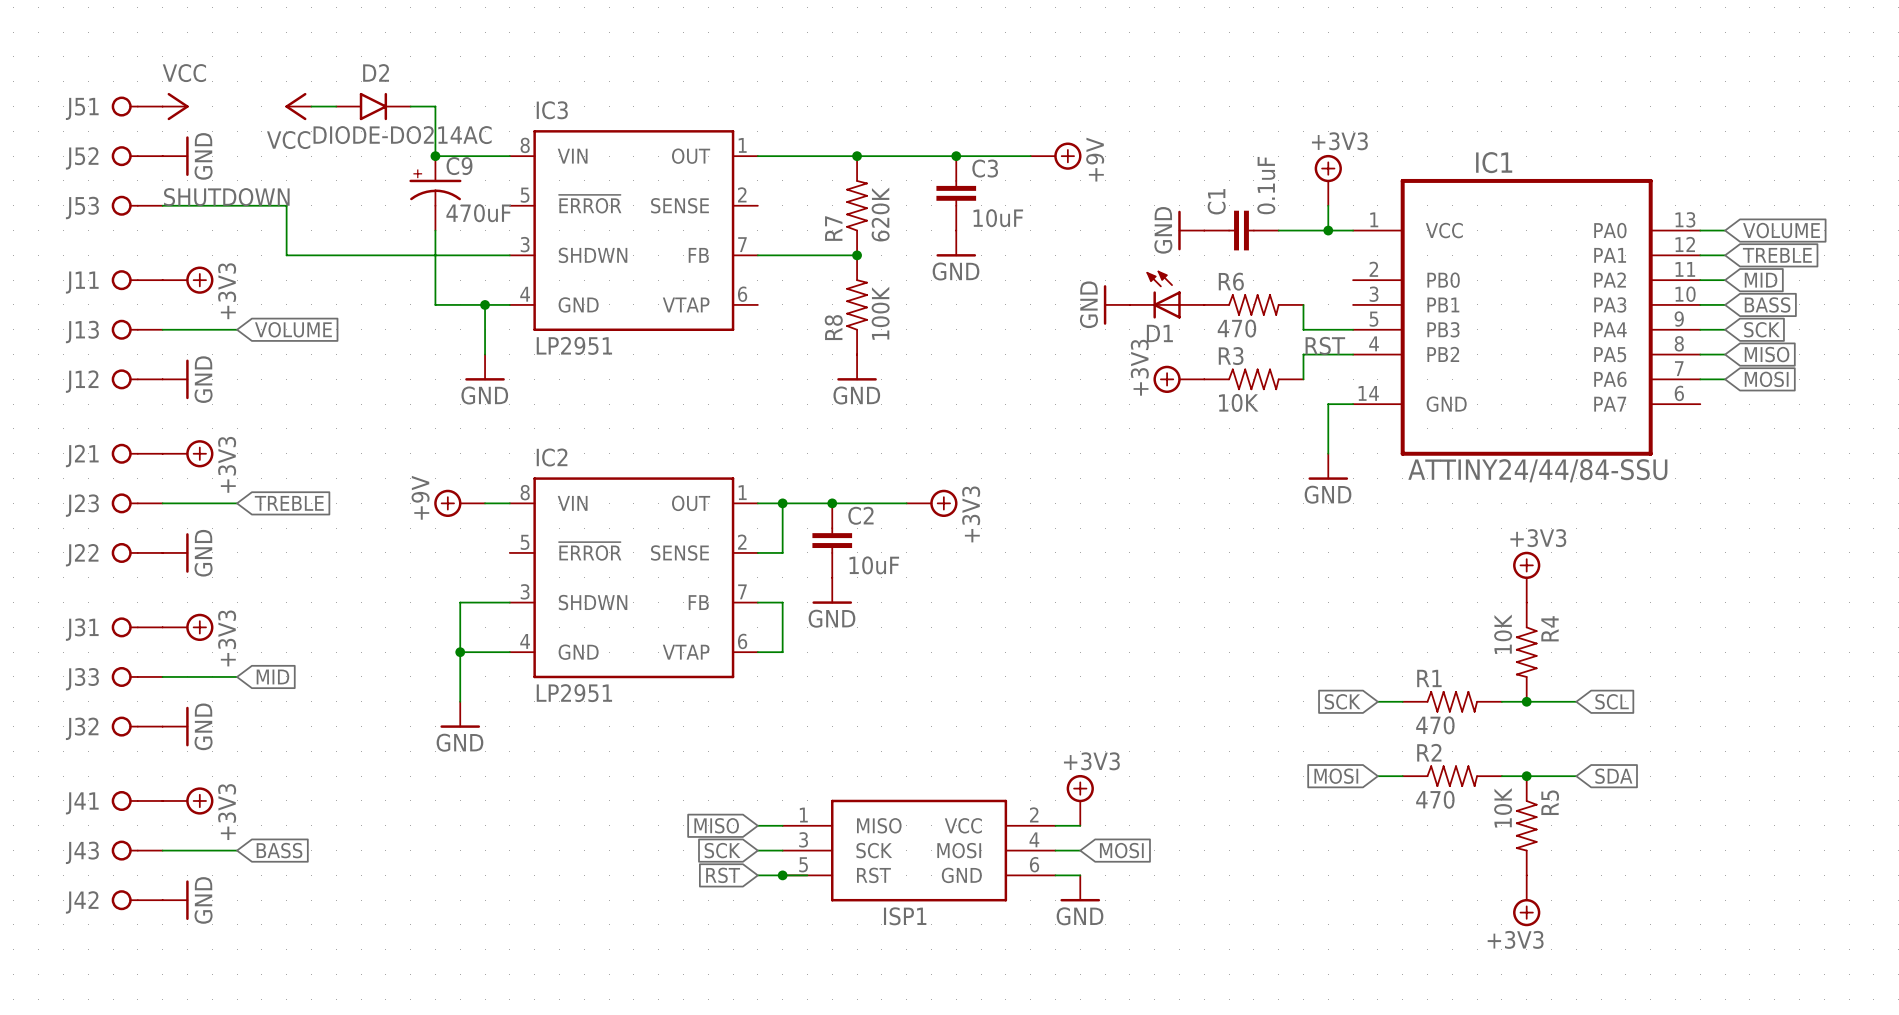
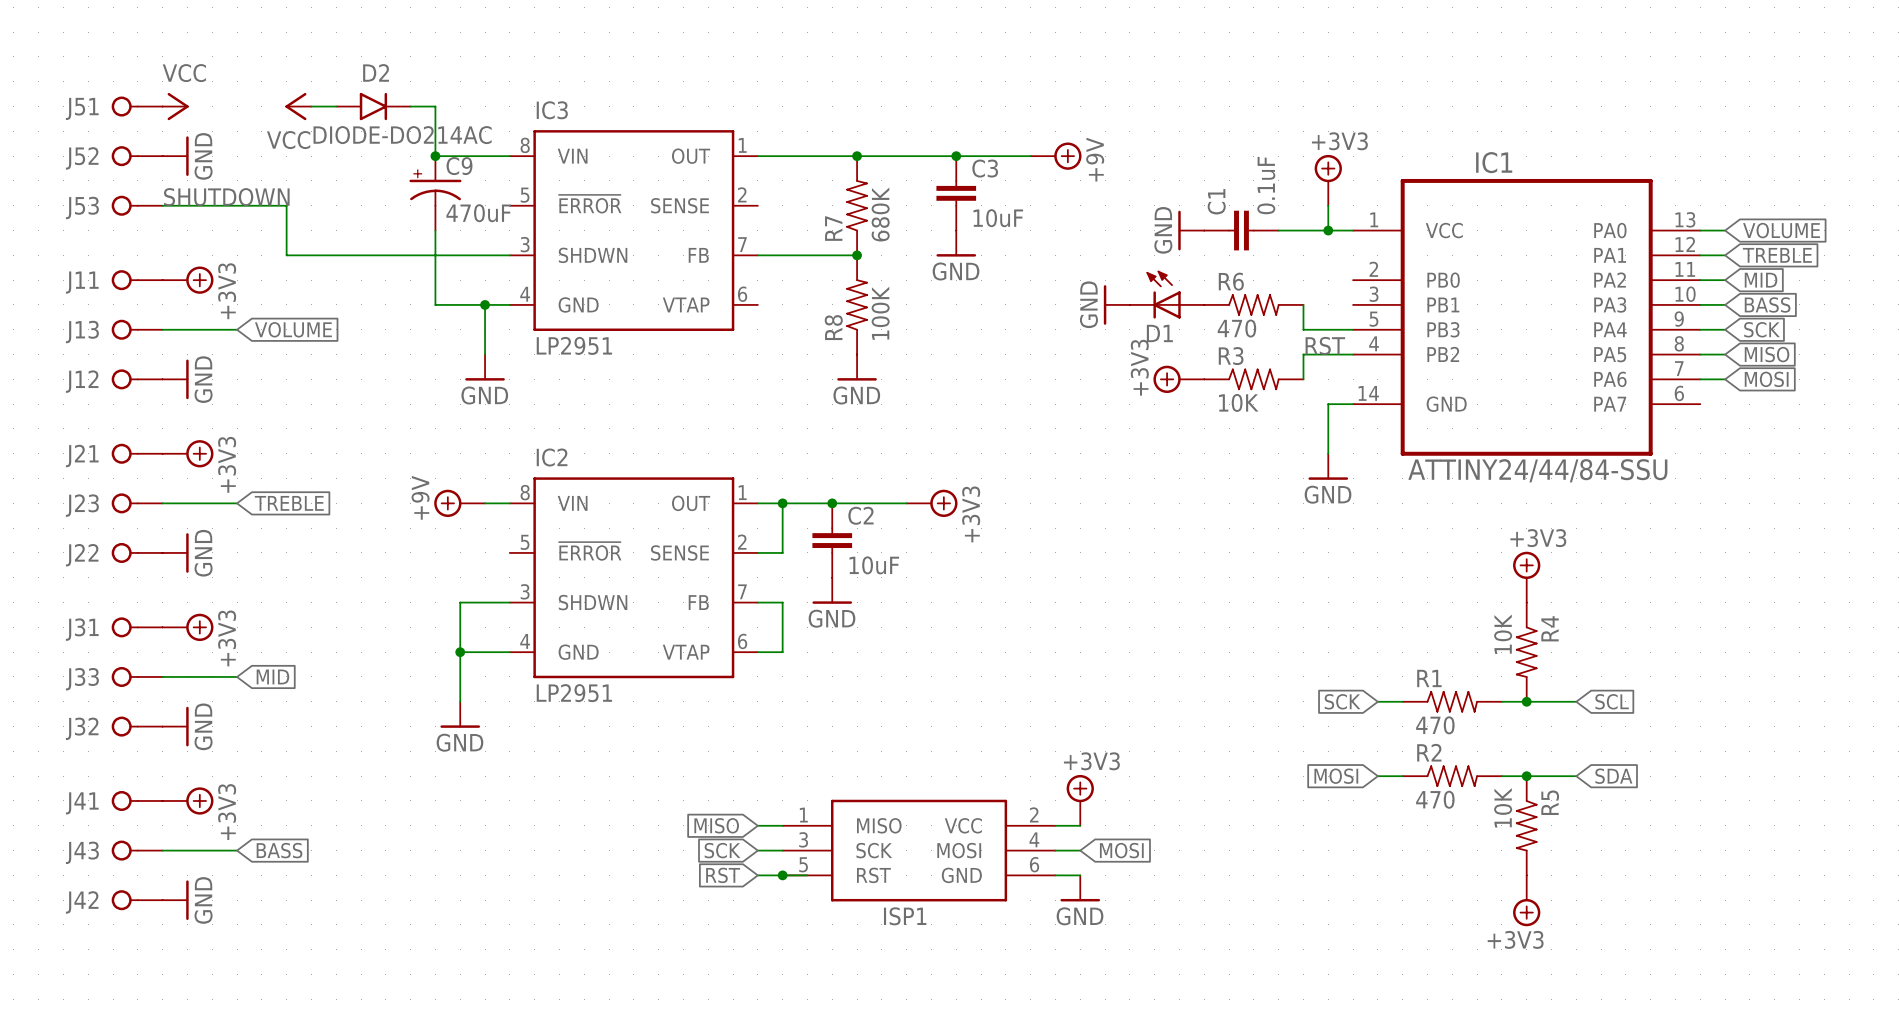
R7 value: 620K (880, 214) -> 680K (880, 214)

